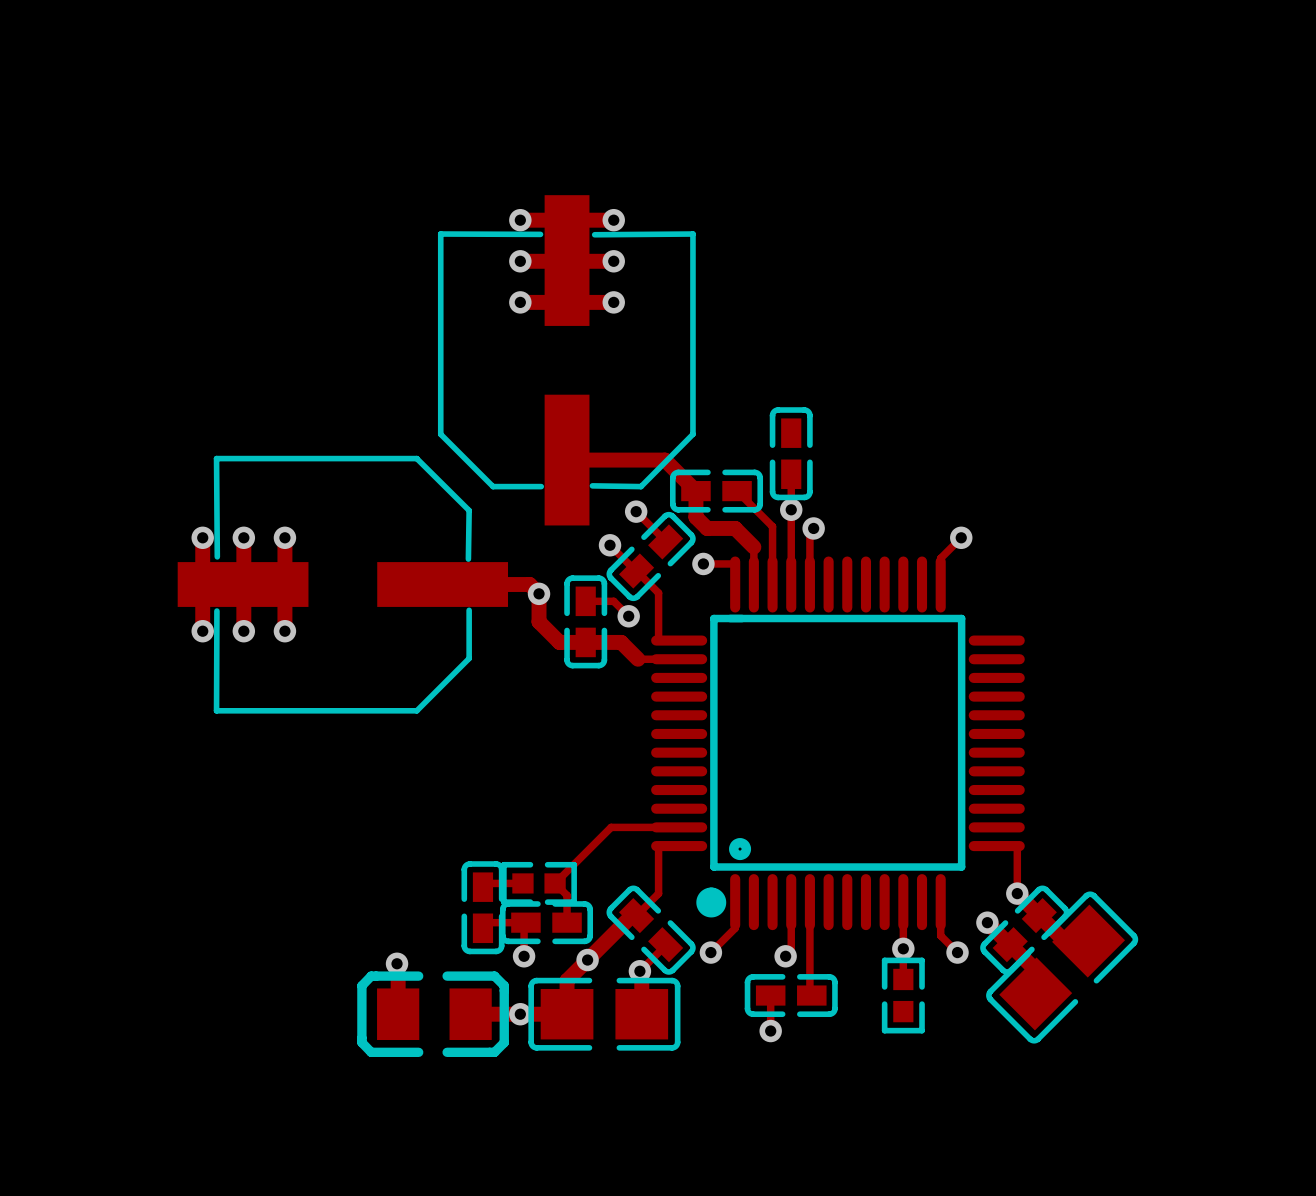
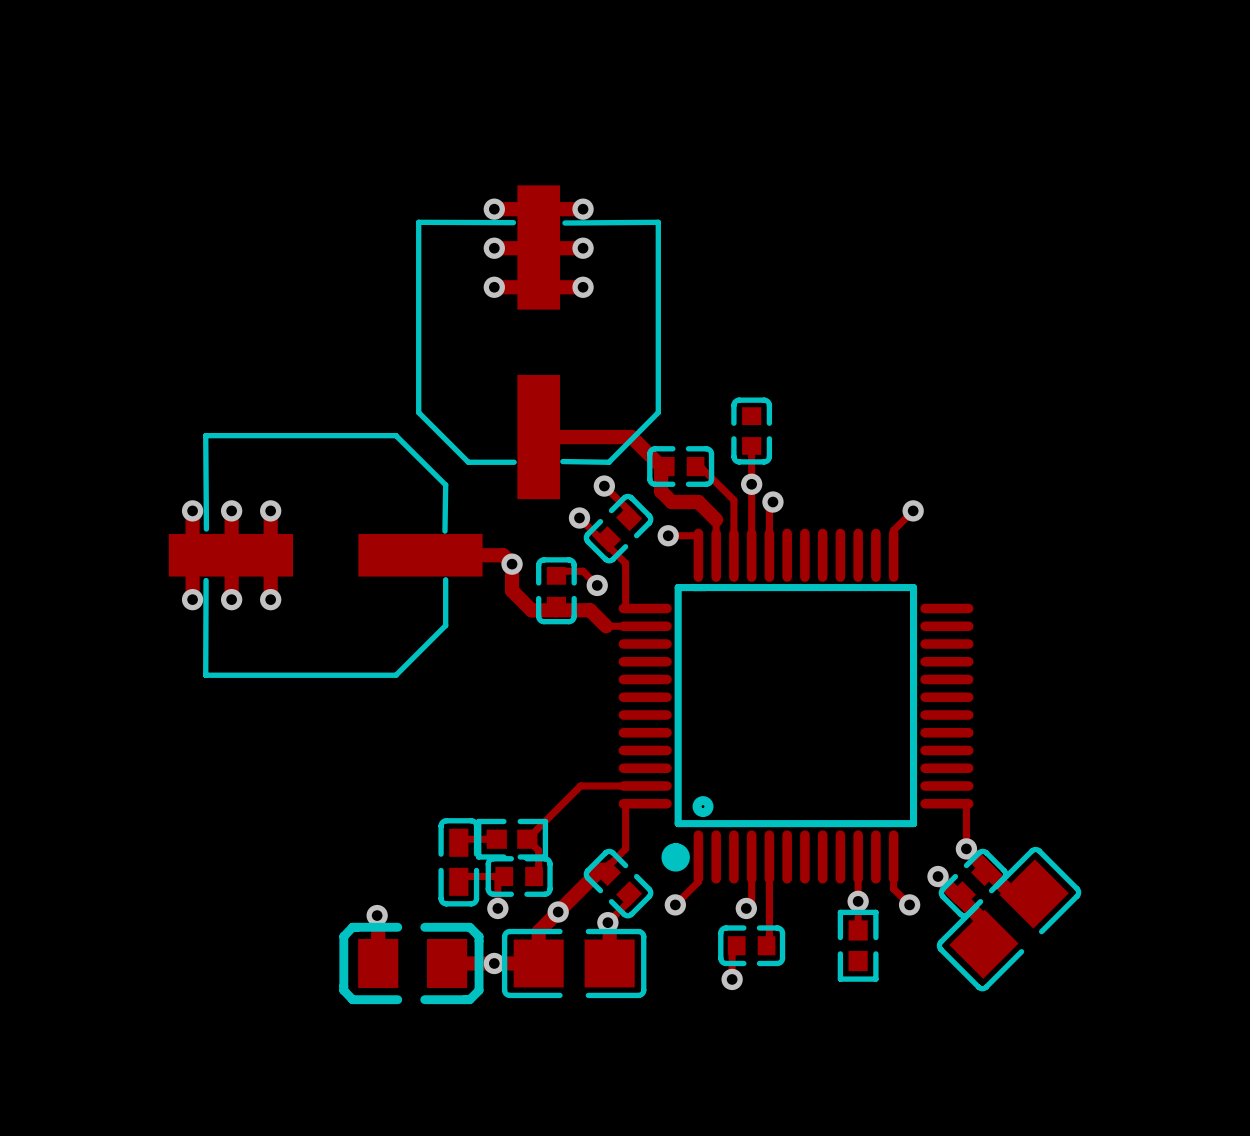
part footprint: [769, 407, 813, 501] -> [731, 397, 773, 465]
part footprint: [669, 469, 764, 513] -> [647, 446, 715, 487]
part footprint: [606, 511, 696, 602] -> [583, 493, 654, 564]
part footprint: [564, 575, 608, 669] -> [536, 557, 577, 625]
part footprint: [606, 885, 696, 975] -> [583, 848, 654, 919]
part footprint: [980, 885, 1070, 975] -> [938, 848, 1009, 919]
part footprint: [499, 901, 594, 945] -> [485, 856, 553, 897]
part footprint: [744, 974, 838, 1018] -> [718, 925, 786, 967]

